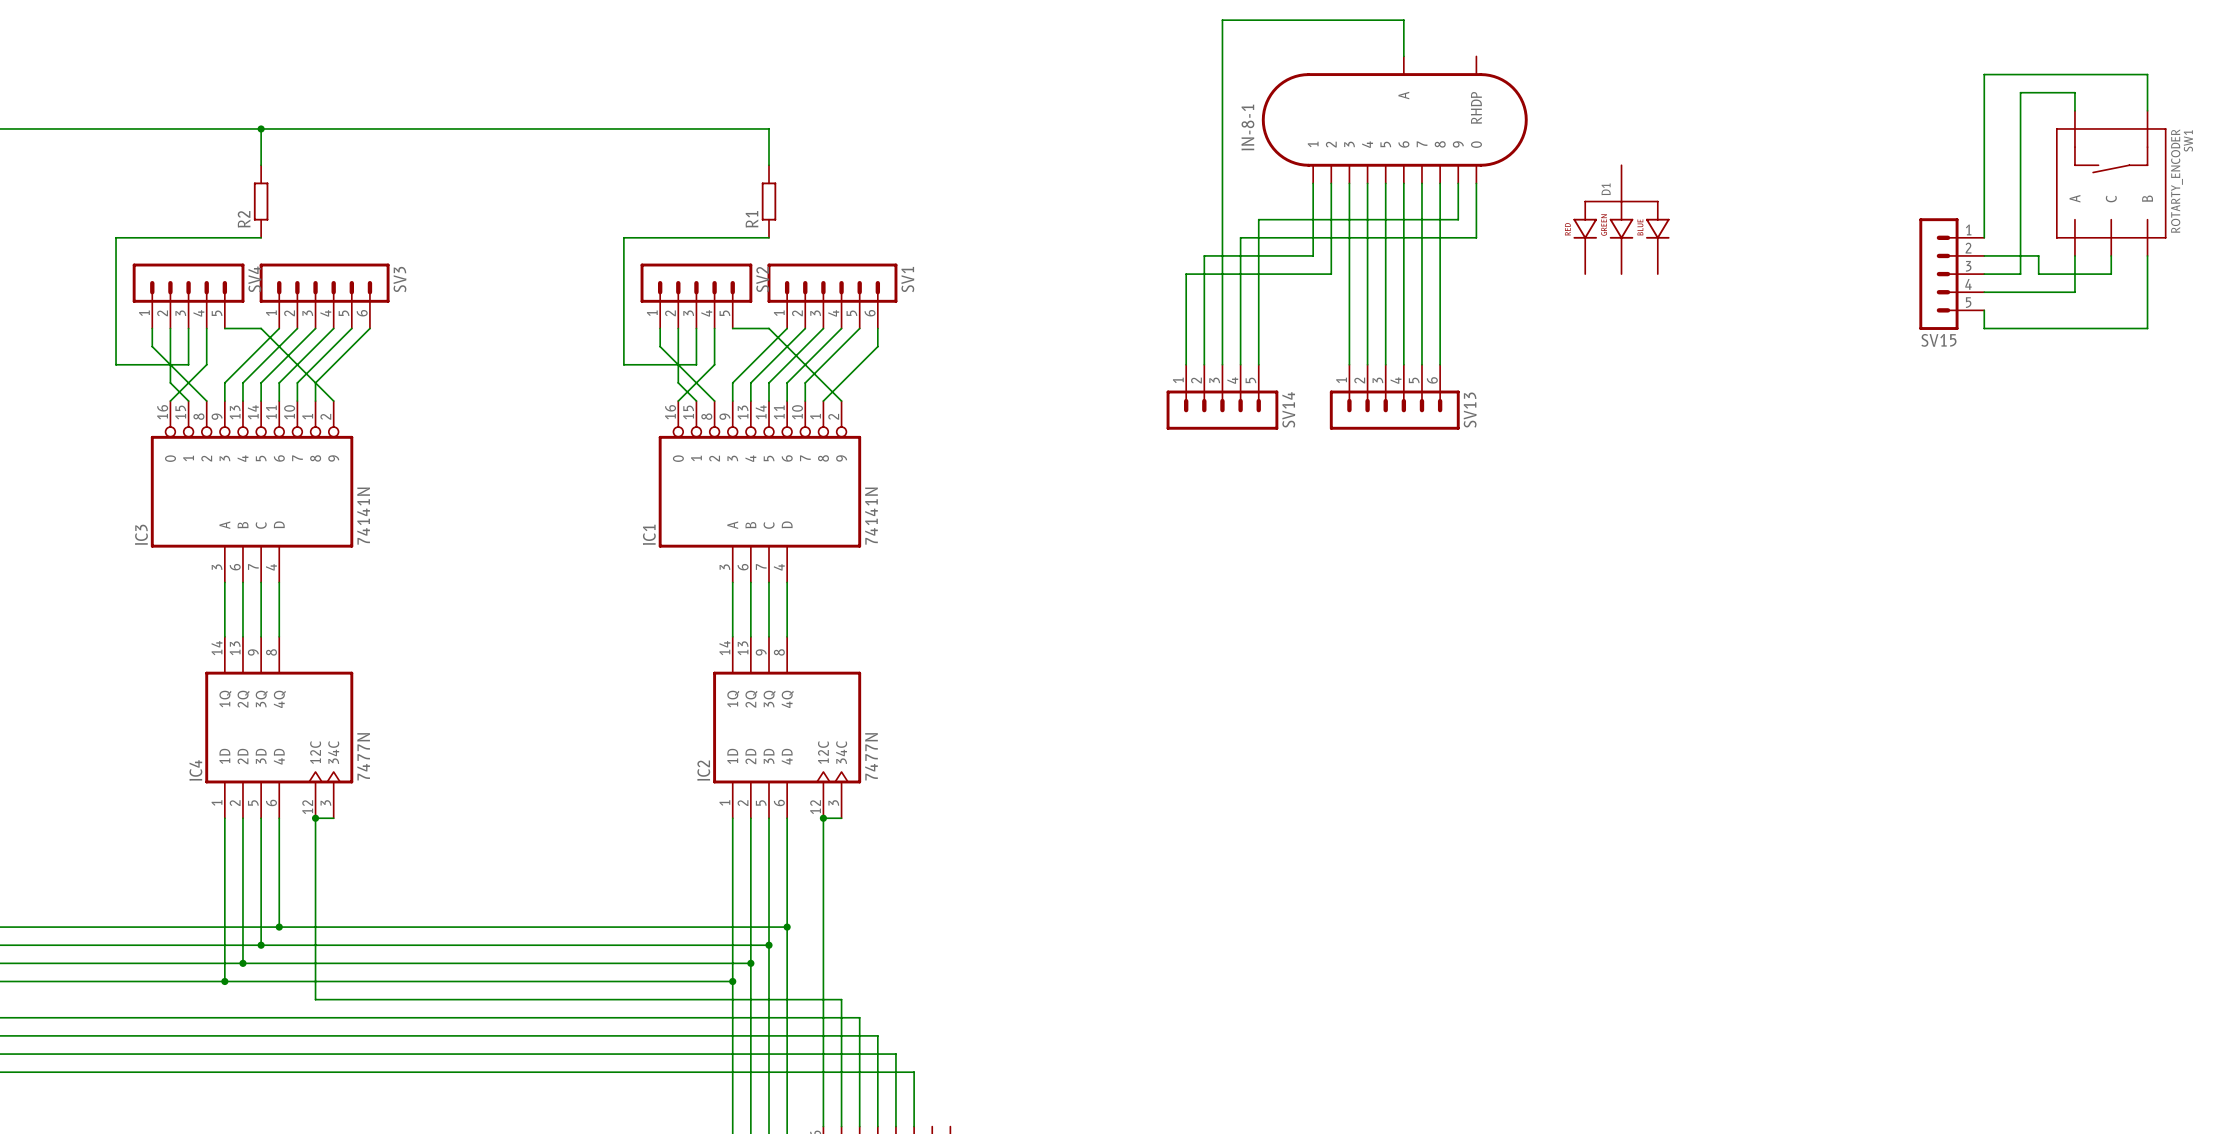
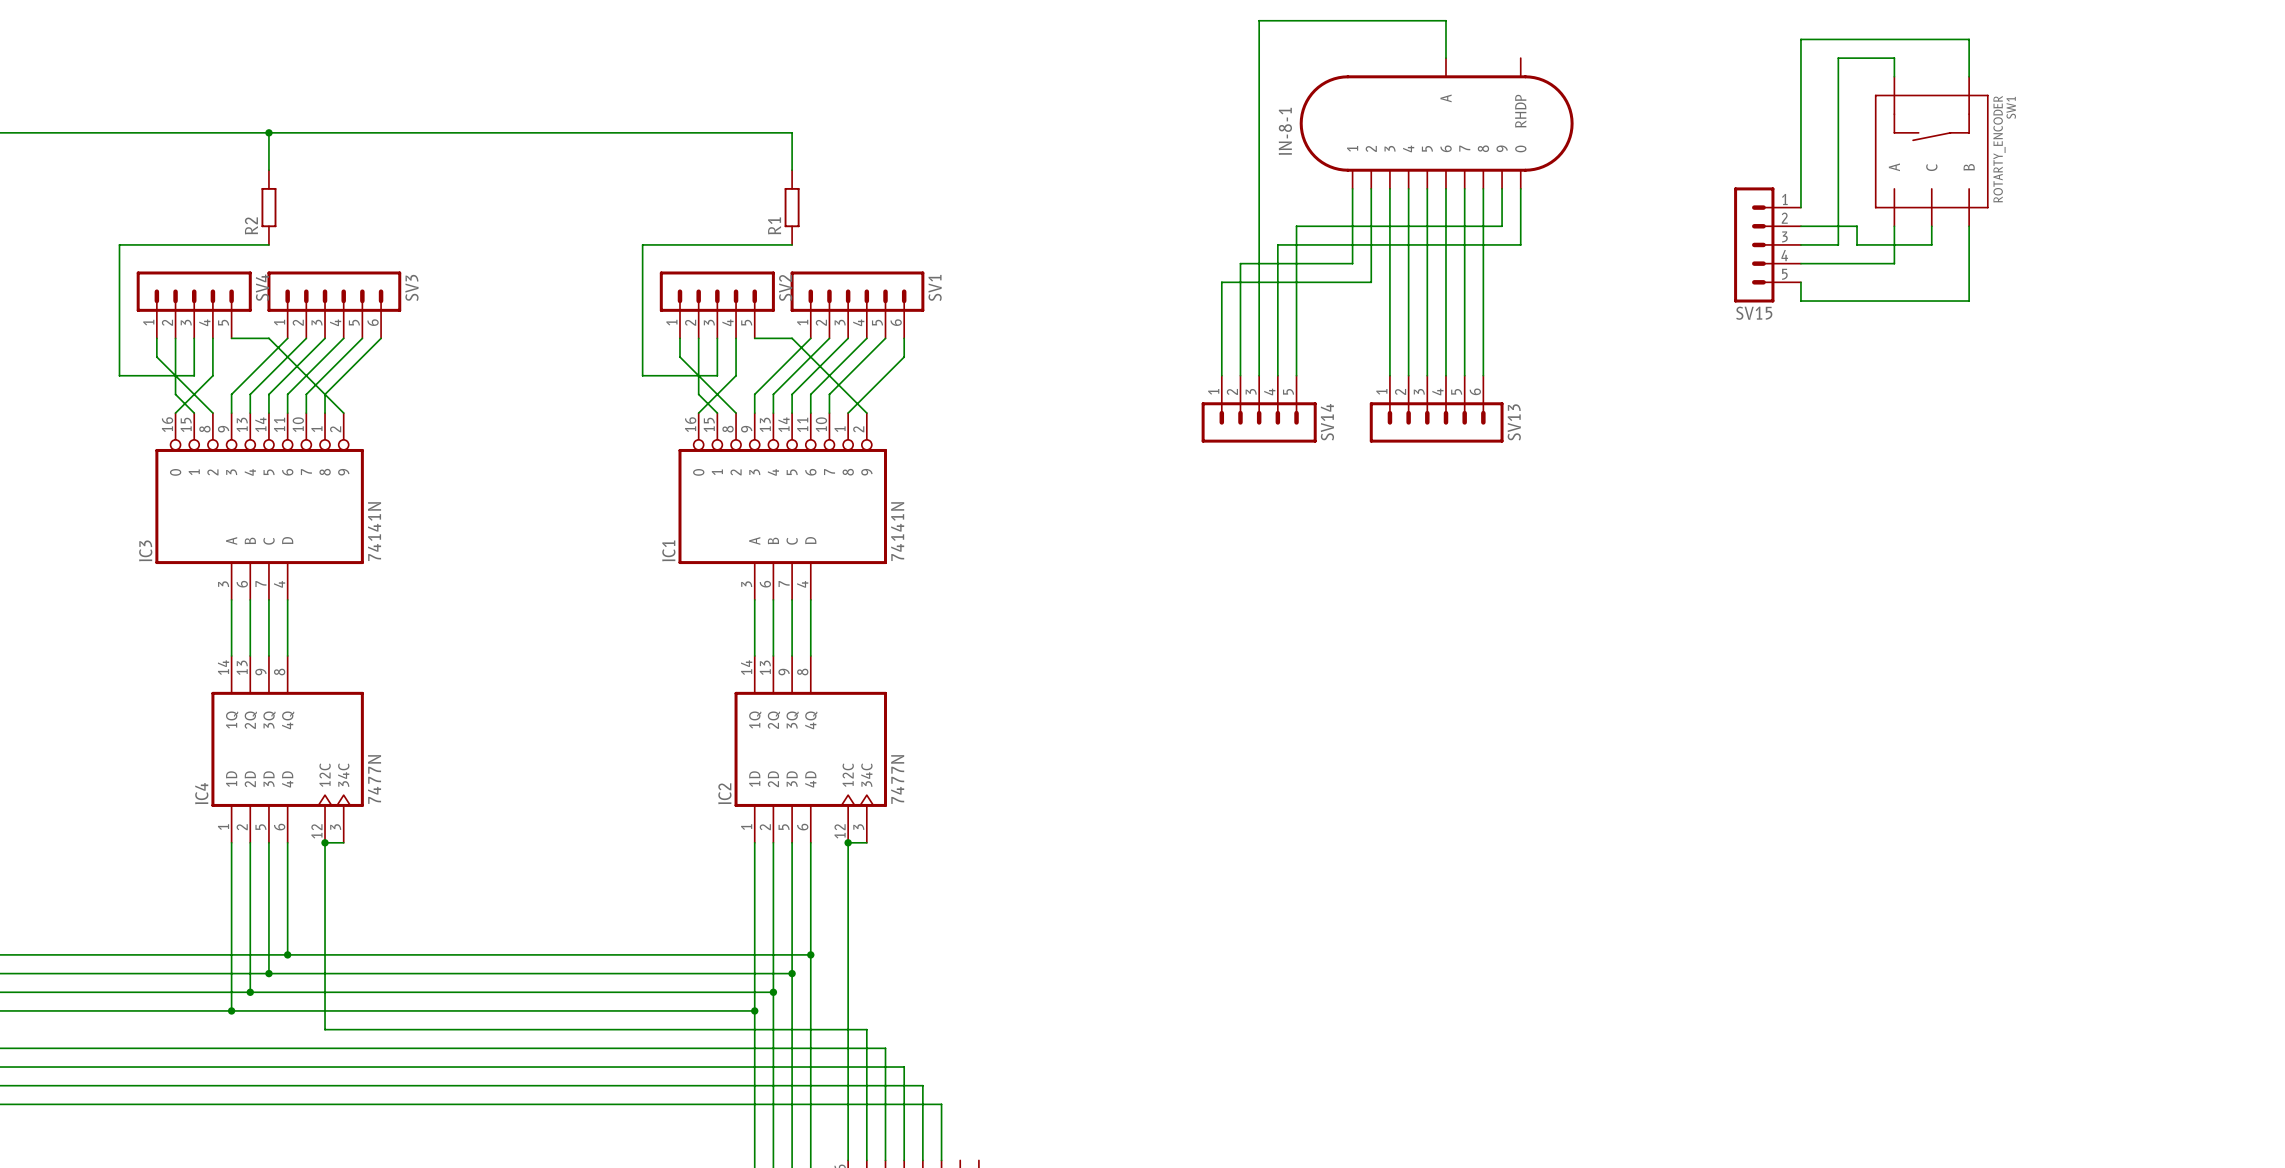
wire: none -> (1894, 76) (1894, 58) (1838, 58) (1838, 244) (1800, 244)
wire: none -> (1969, 76) (1969, 39) (1800, 39) (1800, 207)
wire: (2074, 110) (2074, 92) (2020, 92) (2020, 274) (1984, 274) -> none
wire: (2147, 110) (2147, 74) (1984, 74) (1984, 237) -> none
SW1 position: (2111, 183) -> (1931, 151)
D1: (1621, 219) -> none
wire: none -> (1800, 226) (1857, 226) (1857, 244) (1931, 244) (1931, 226)
wire: none -> (1894, 226) (1894, 263) (1800, 263)
wire: none -> (1969, 226) (1969, 301) (1800, 301) (1800, 282)
wire: (1984, 255) (2038, 255) (2038, 274) (2111, 274) (2111, 255) -> none
wire: (2074, 255) (2074, 292) (1984, 292) -> none
wire: (2147, 255) (2147, 328) (1984, 328) (1984, 310) -> none
SV15 position: (1951, 274) -> (1767, 244)

